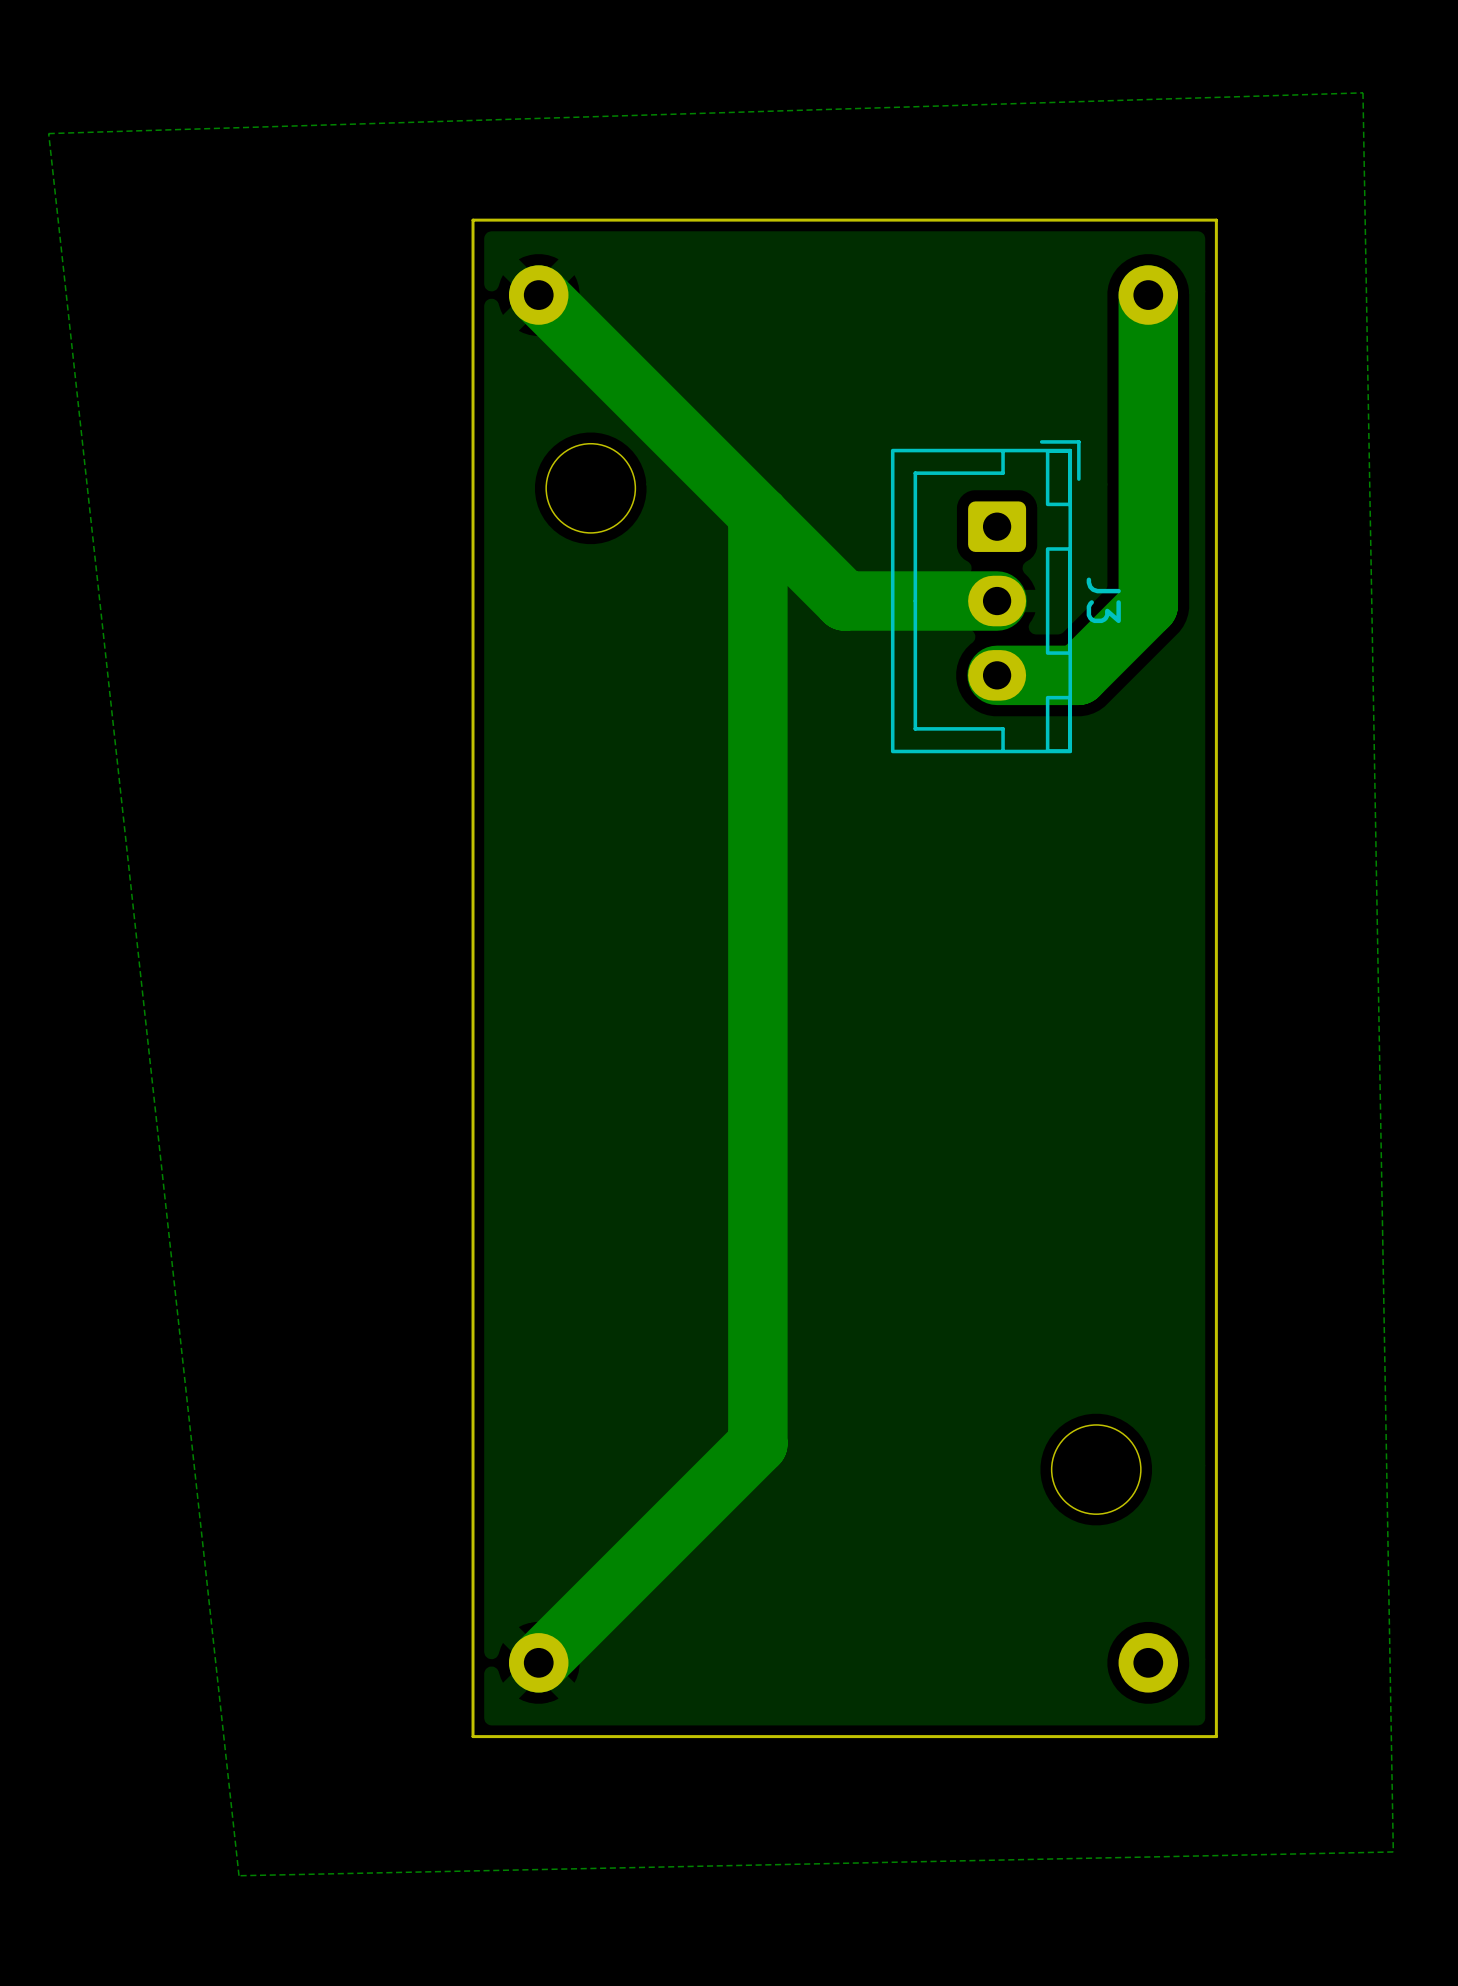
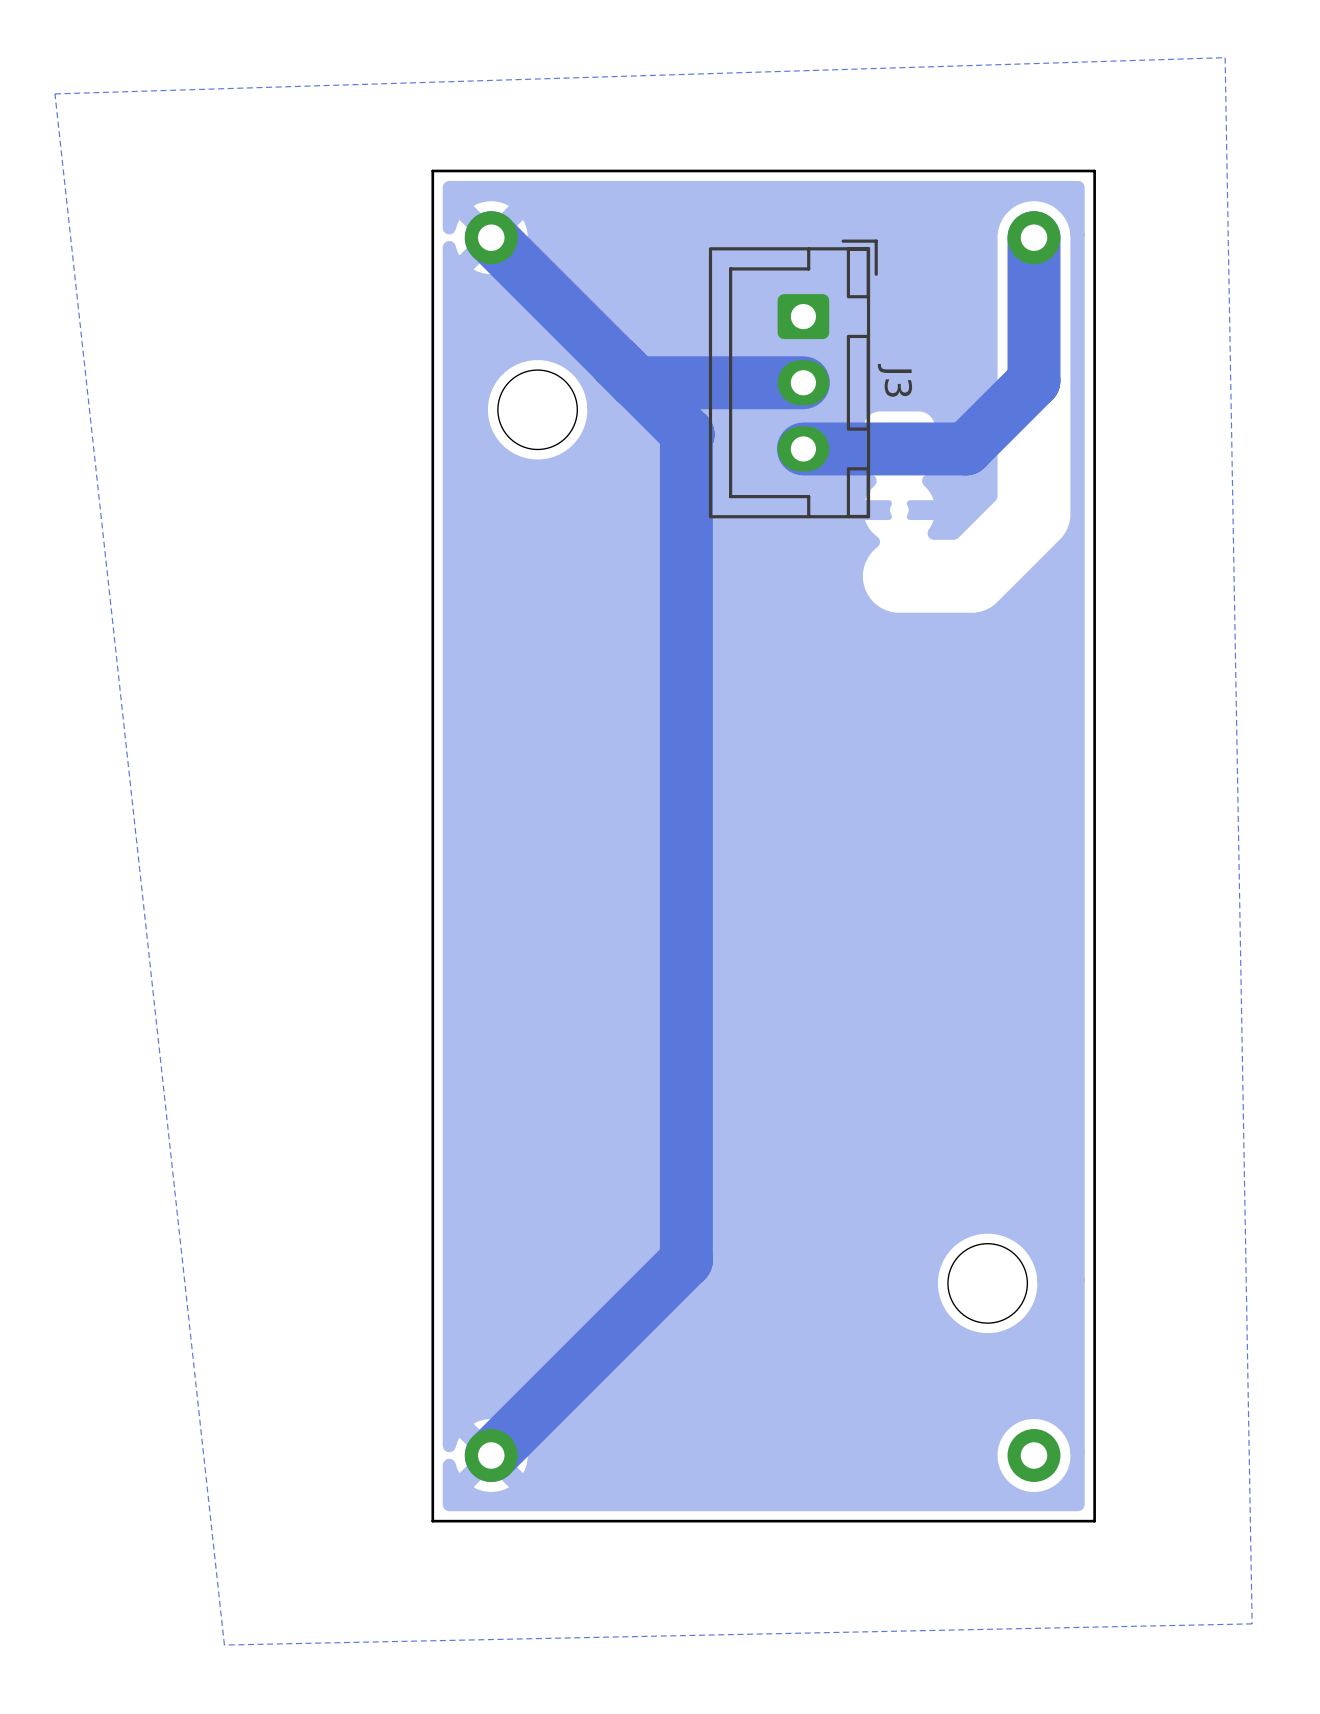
track: (1148, 455) (1148, 605) (1078, 675) (997, 675) -> (1033, 380) (965, 448) (803, 448)
track: none -> (803, 382) (636, 382)
track: (759, 516) (844, 601) (997, 601) -> none
J3 position: (985, 596) -> (793, 378)

